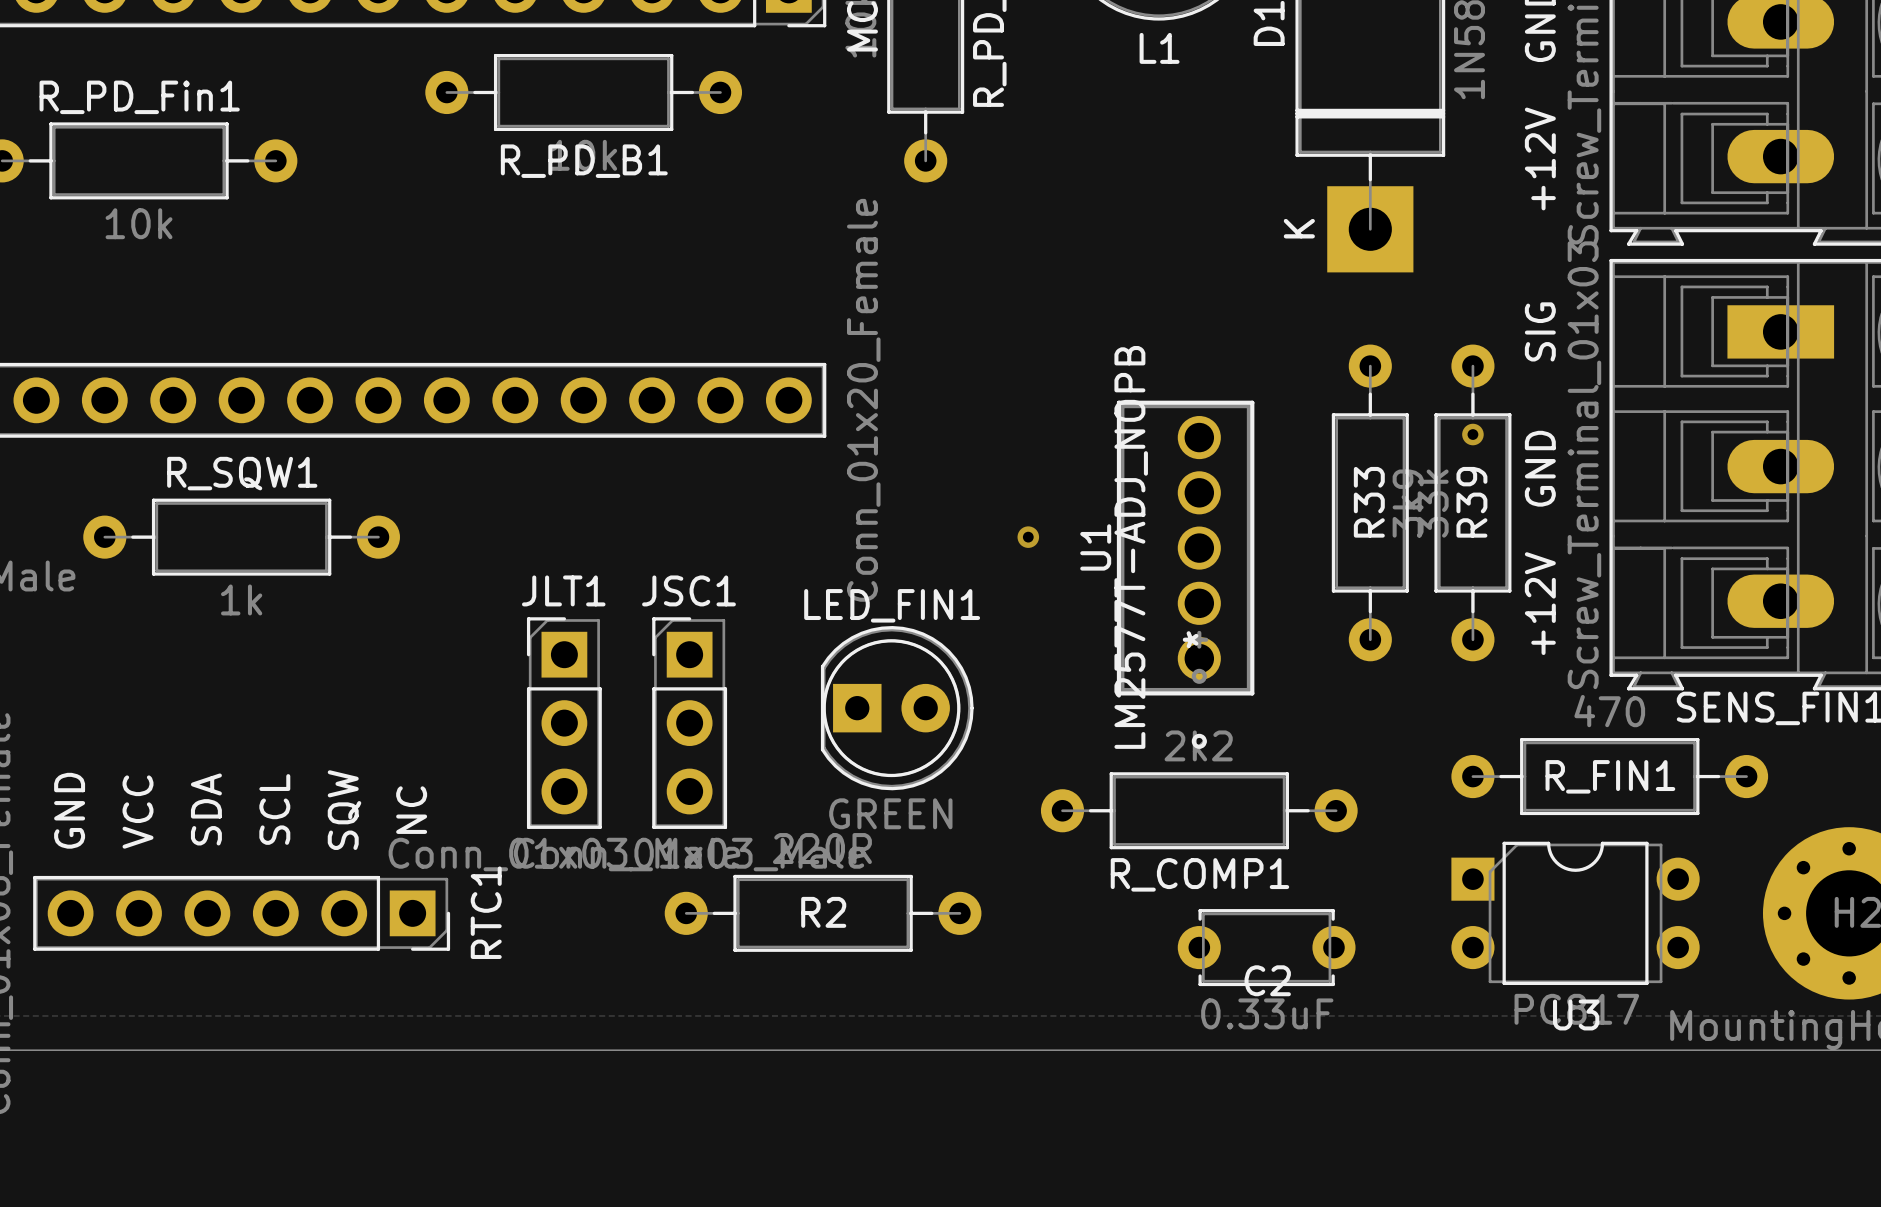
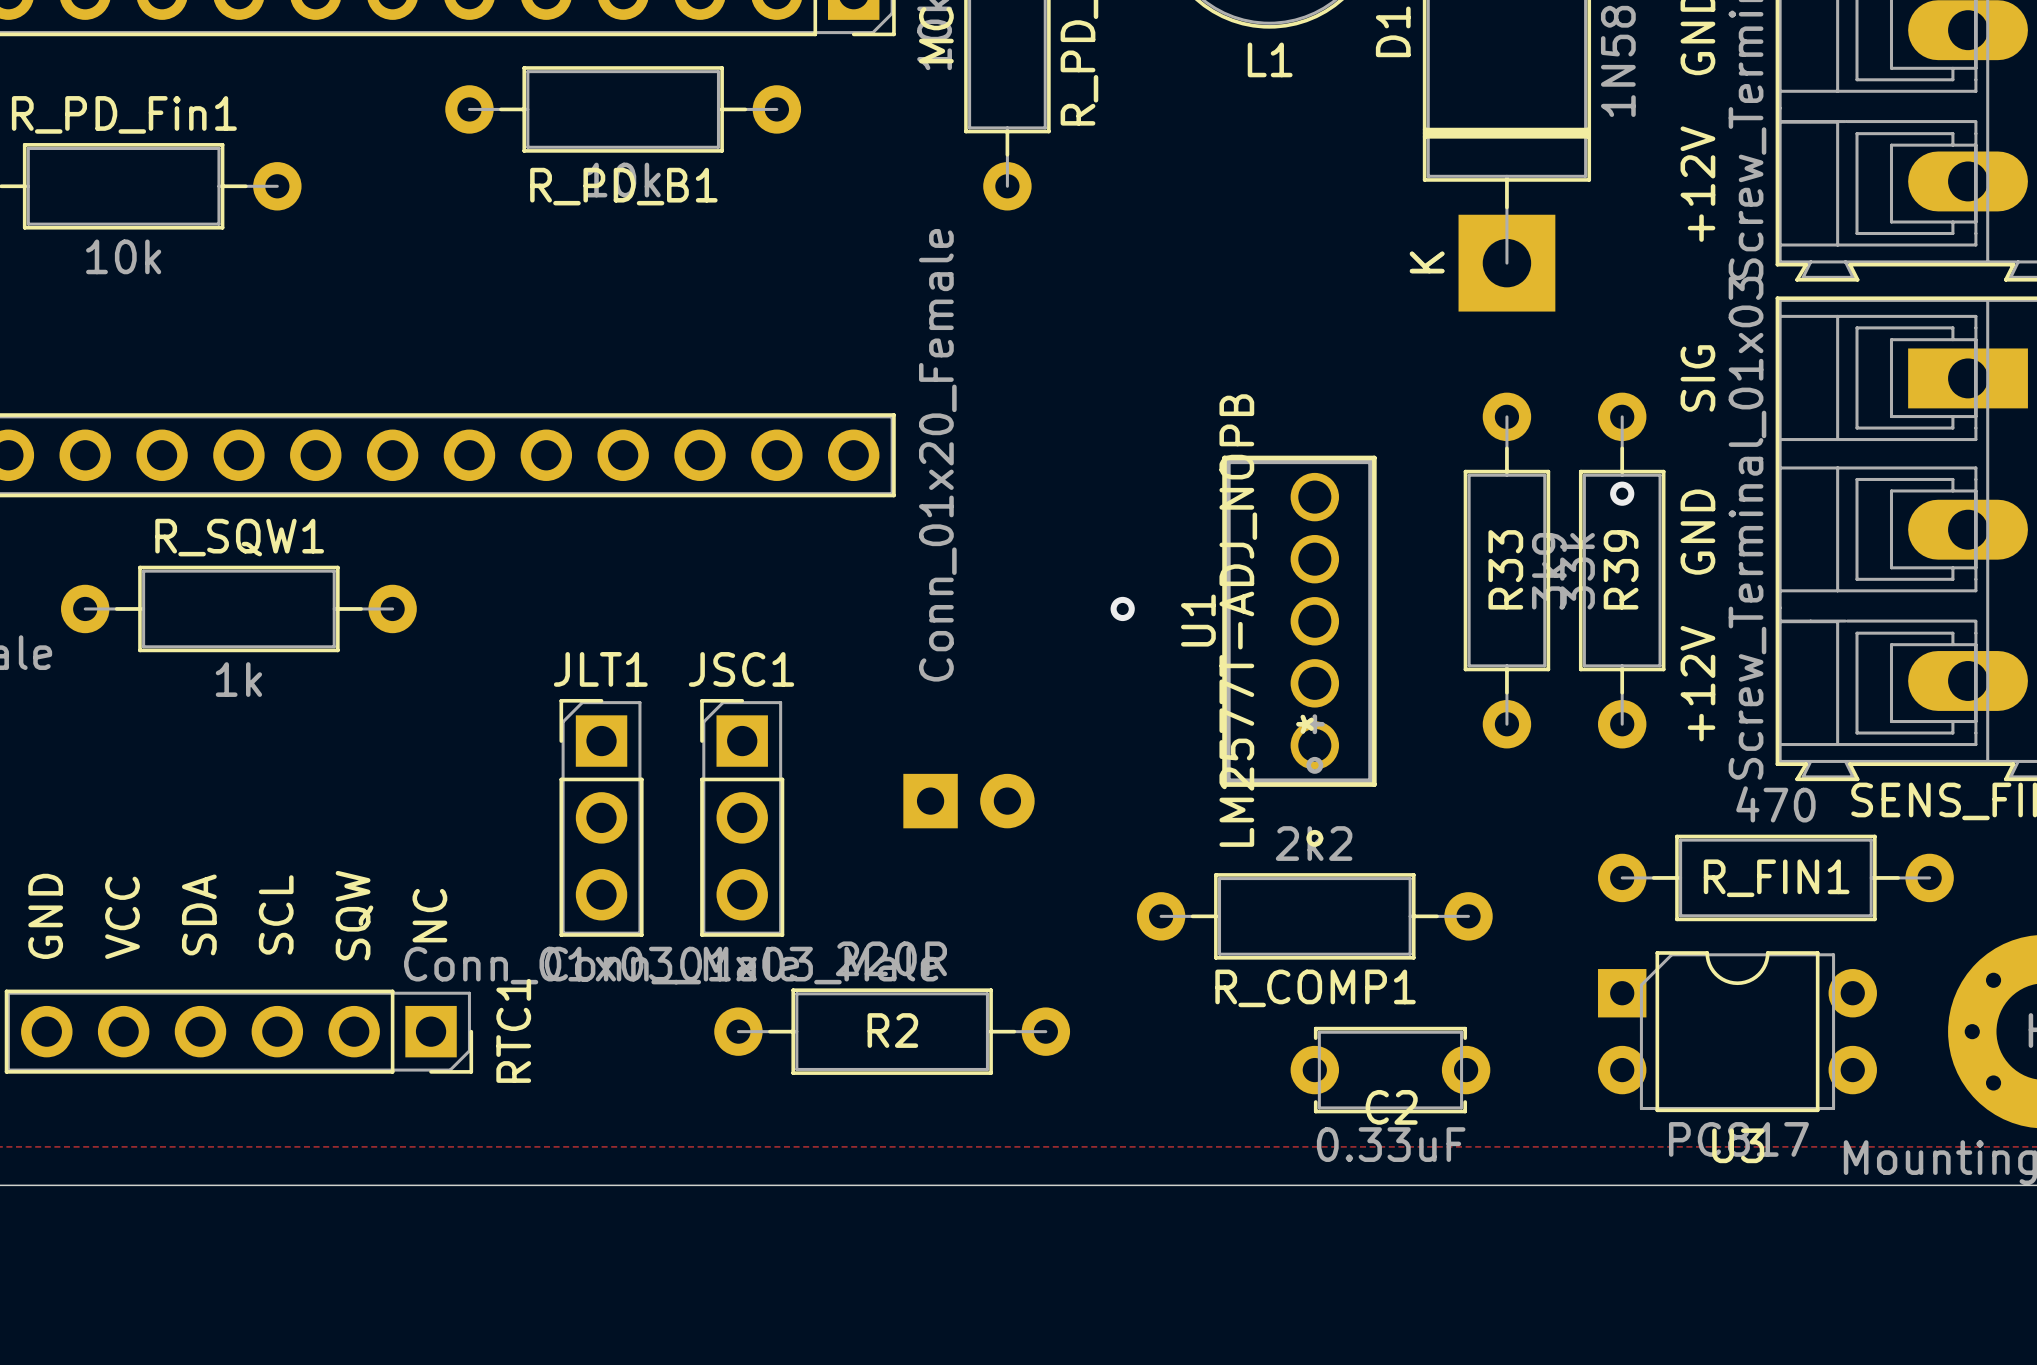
LED_FIN1 side: top (897, 708) -> bottom (968, 801)

